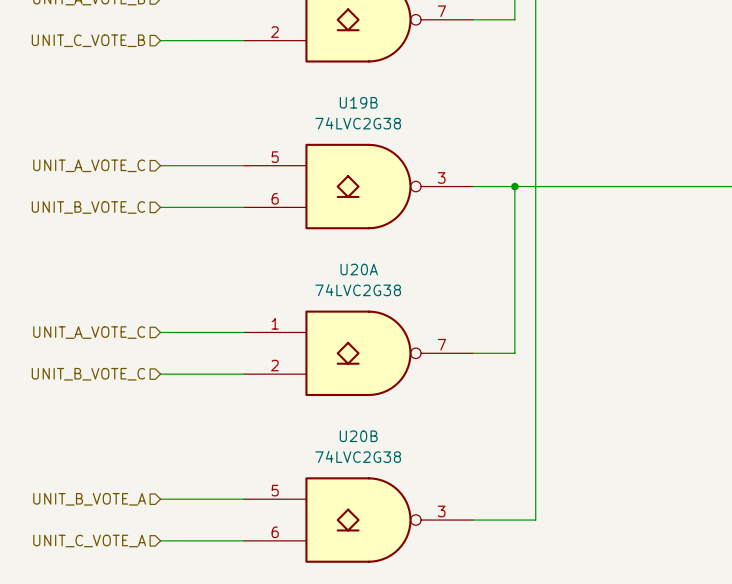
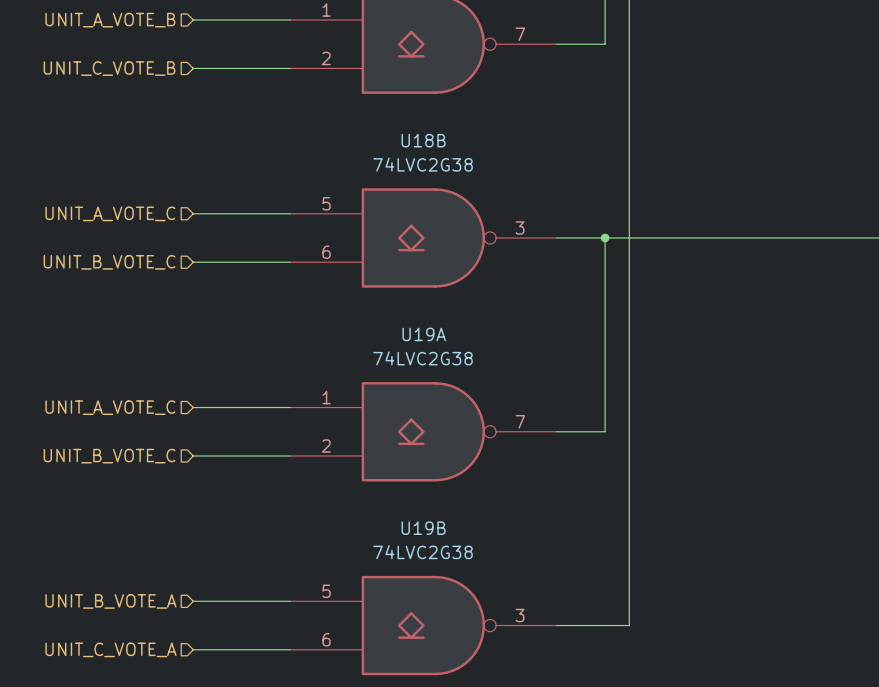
U19B name: U19B (358, 102) -> U18B (423, 140)
U20A name: U20A (359, 269) -> U19A (424, 334)
U20B name: U20B (358, 436) -> U19B (423, 528)

